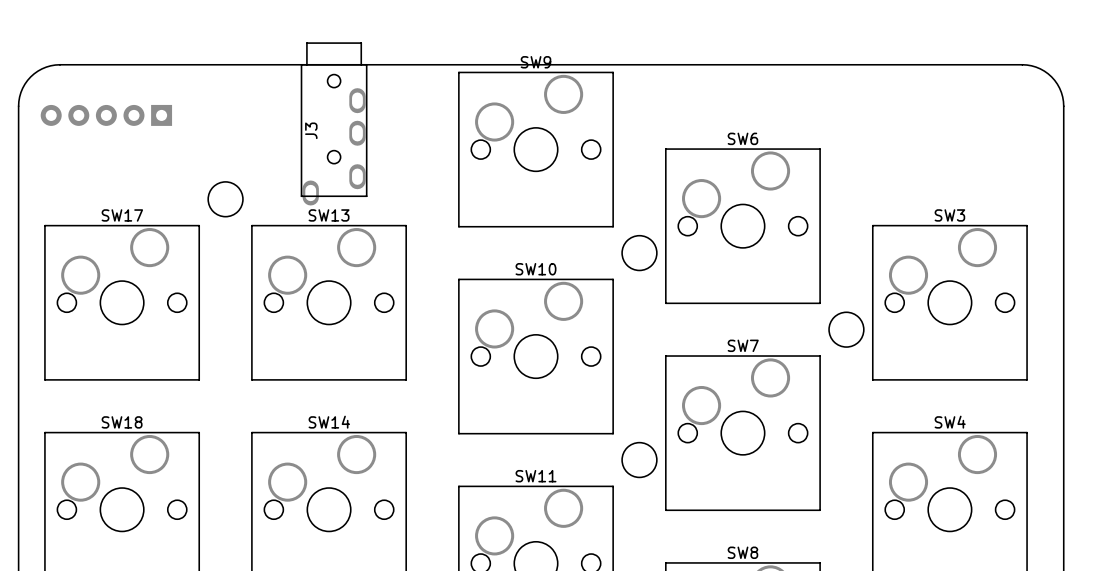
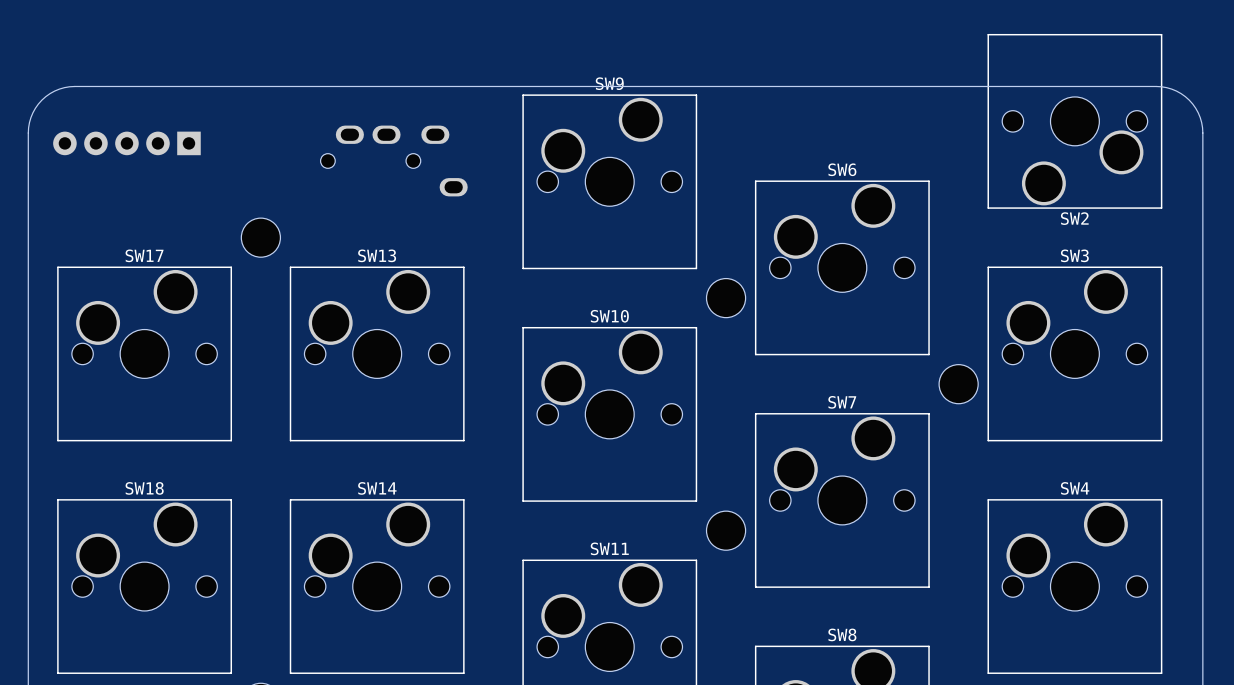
SW2: none -> (1074, 121)
J3: (334, 123) -> none
part: none -> (394, 160)

